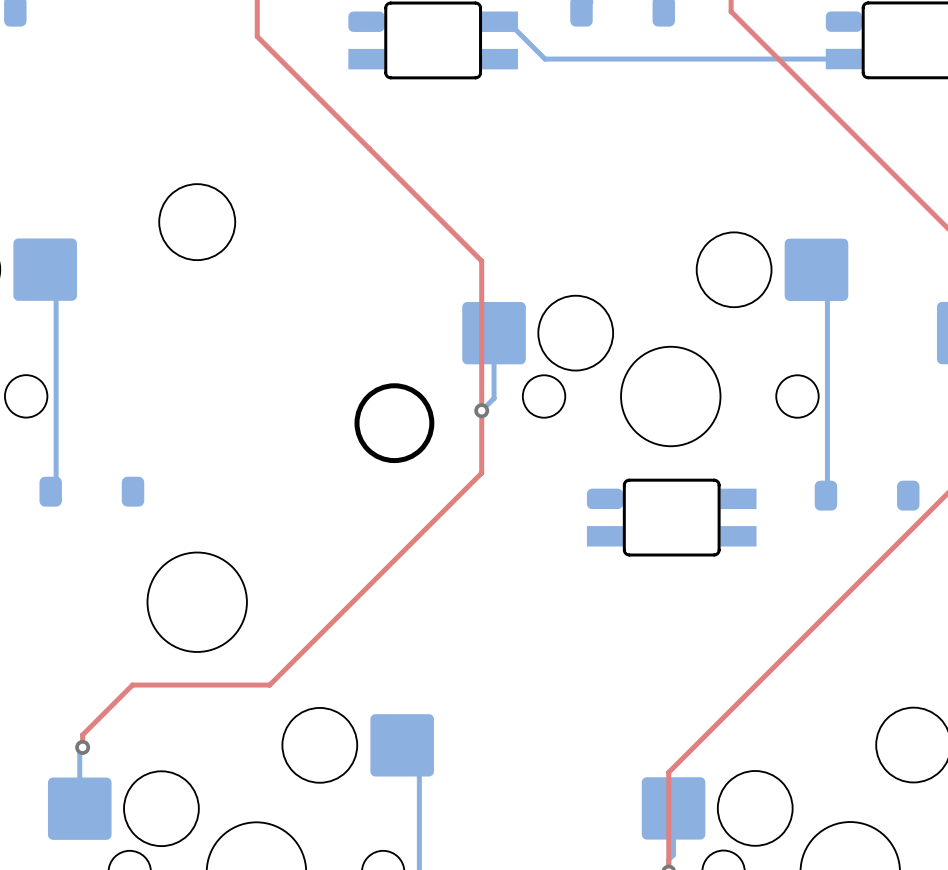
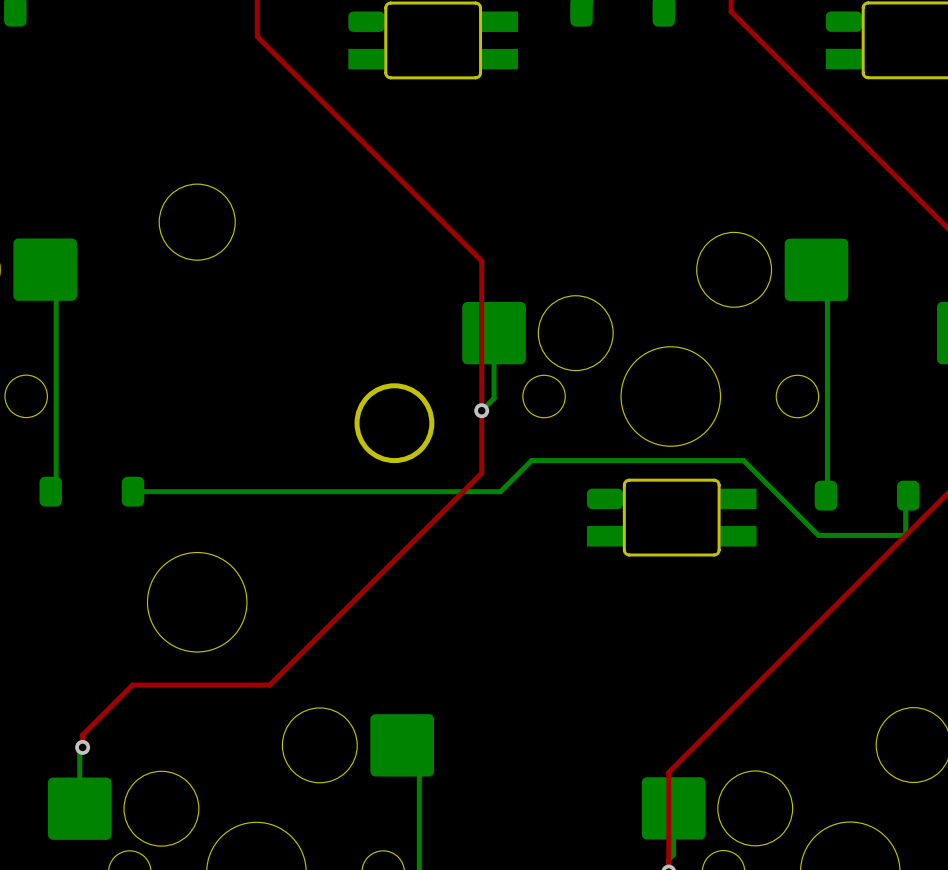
bottom track: (499, 21) (507, 21) (545, 59) (843, 59) -> none
bottom track: none -> (133, 491) (500, 491) (531, 460) (743, 460) (818, 535) (905, 535) (905, 498) (908, 495)

